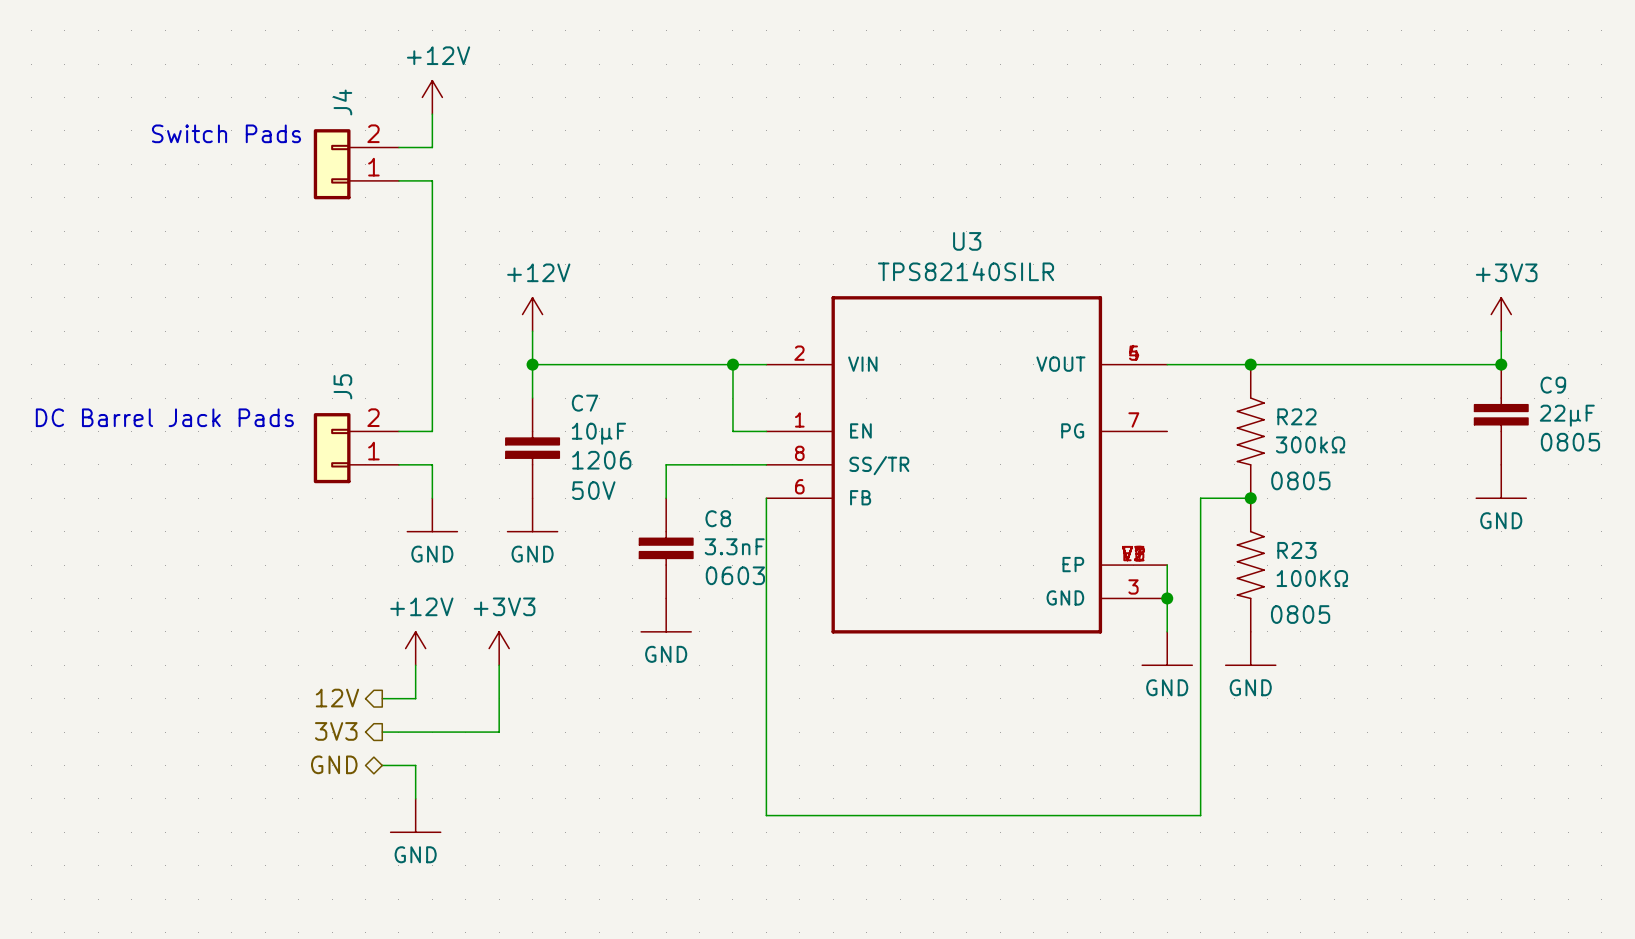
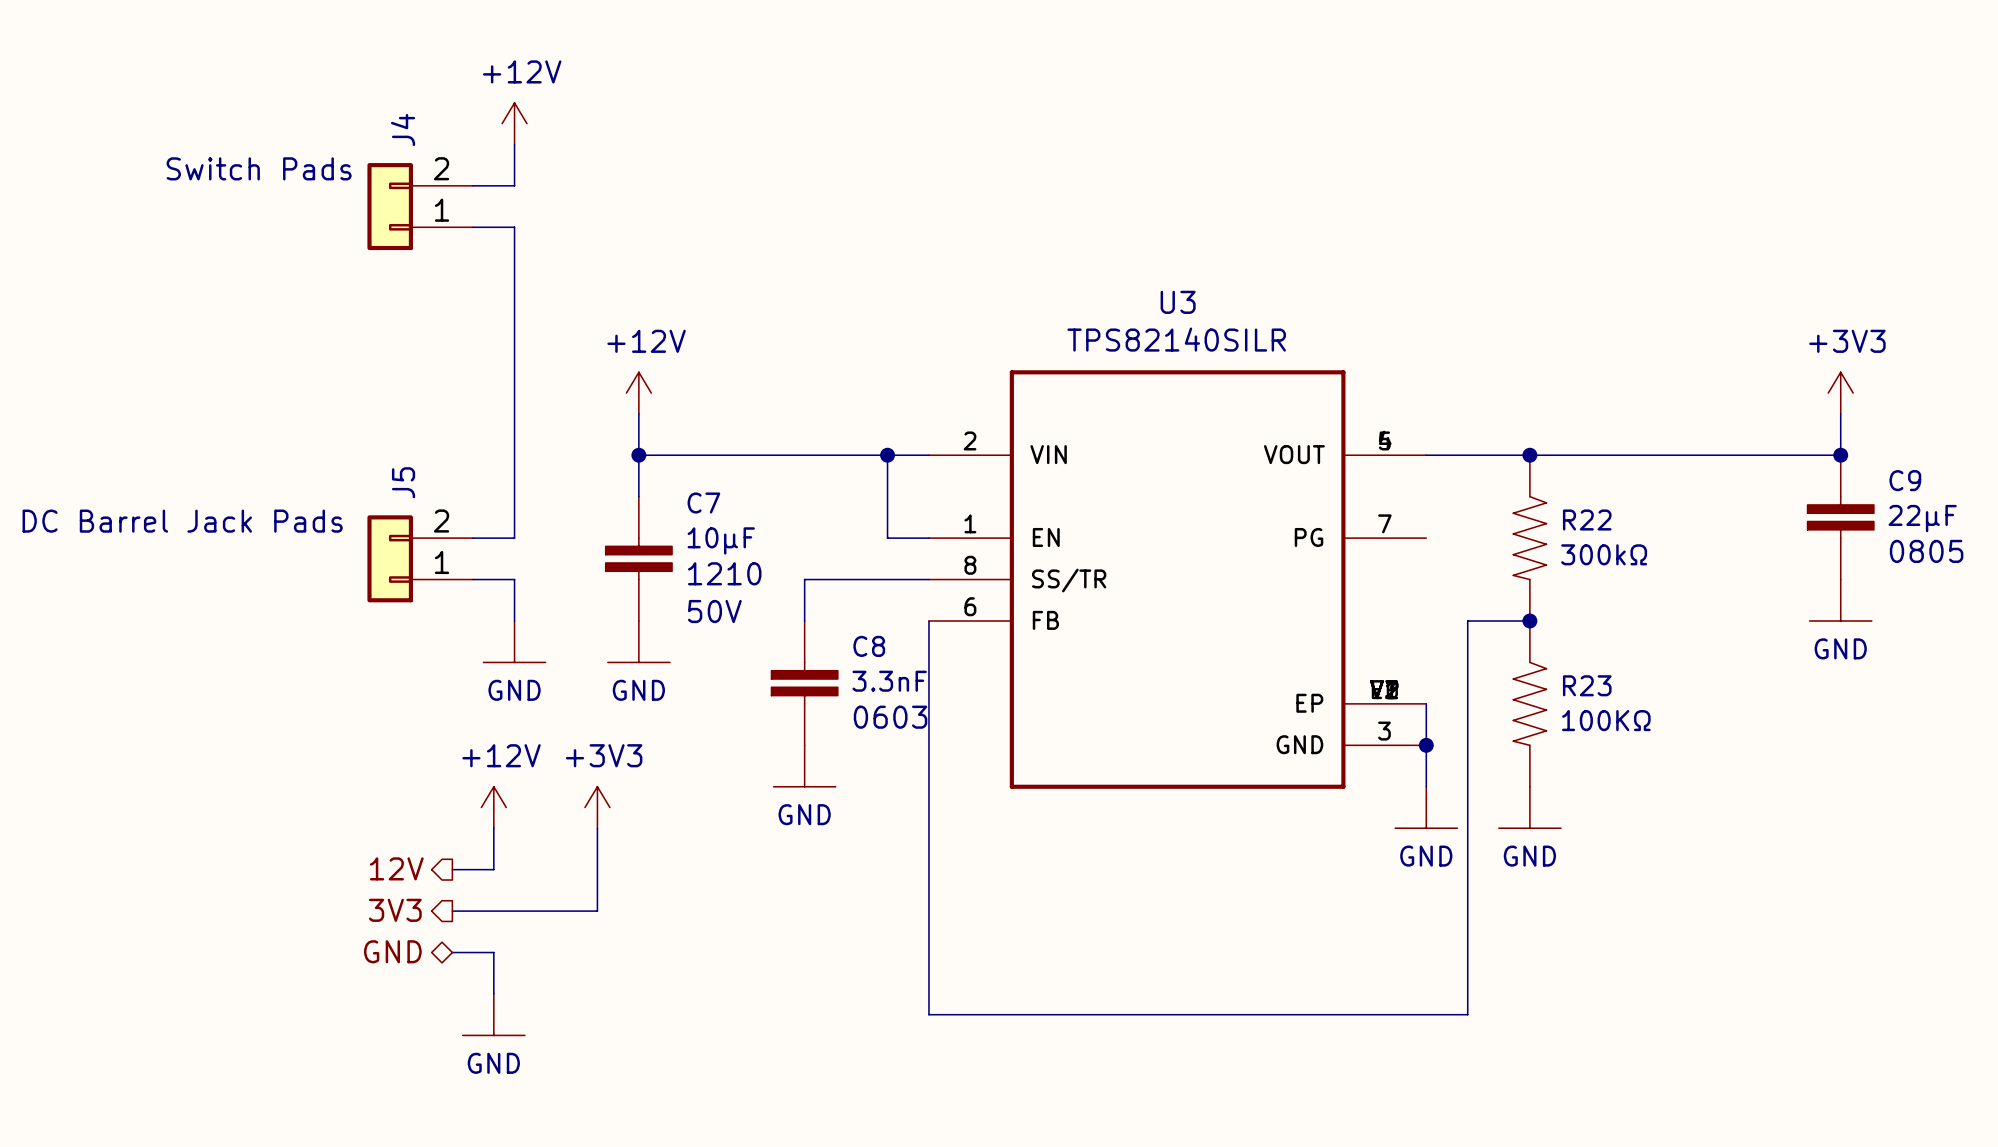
C7 text: 1206 (601, 460) -> 1210 (724, 573)
R22 text: 0805 (1300, 480) -> none
R23 text: 0805 (1300, 614) -> none

